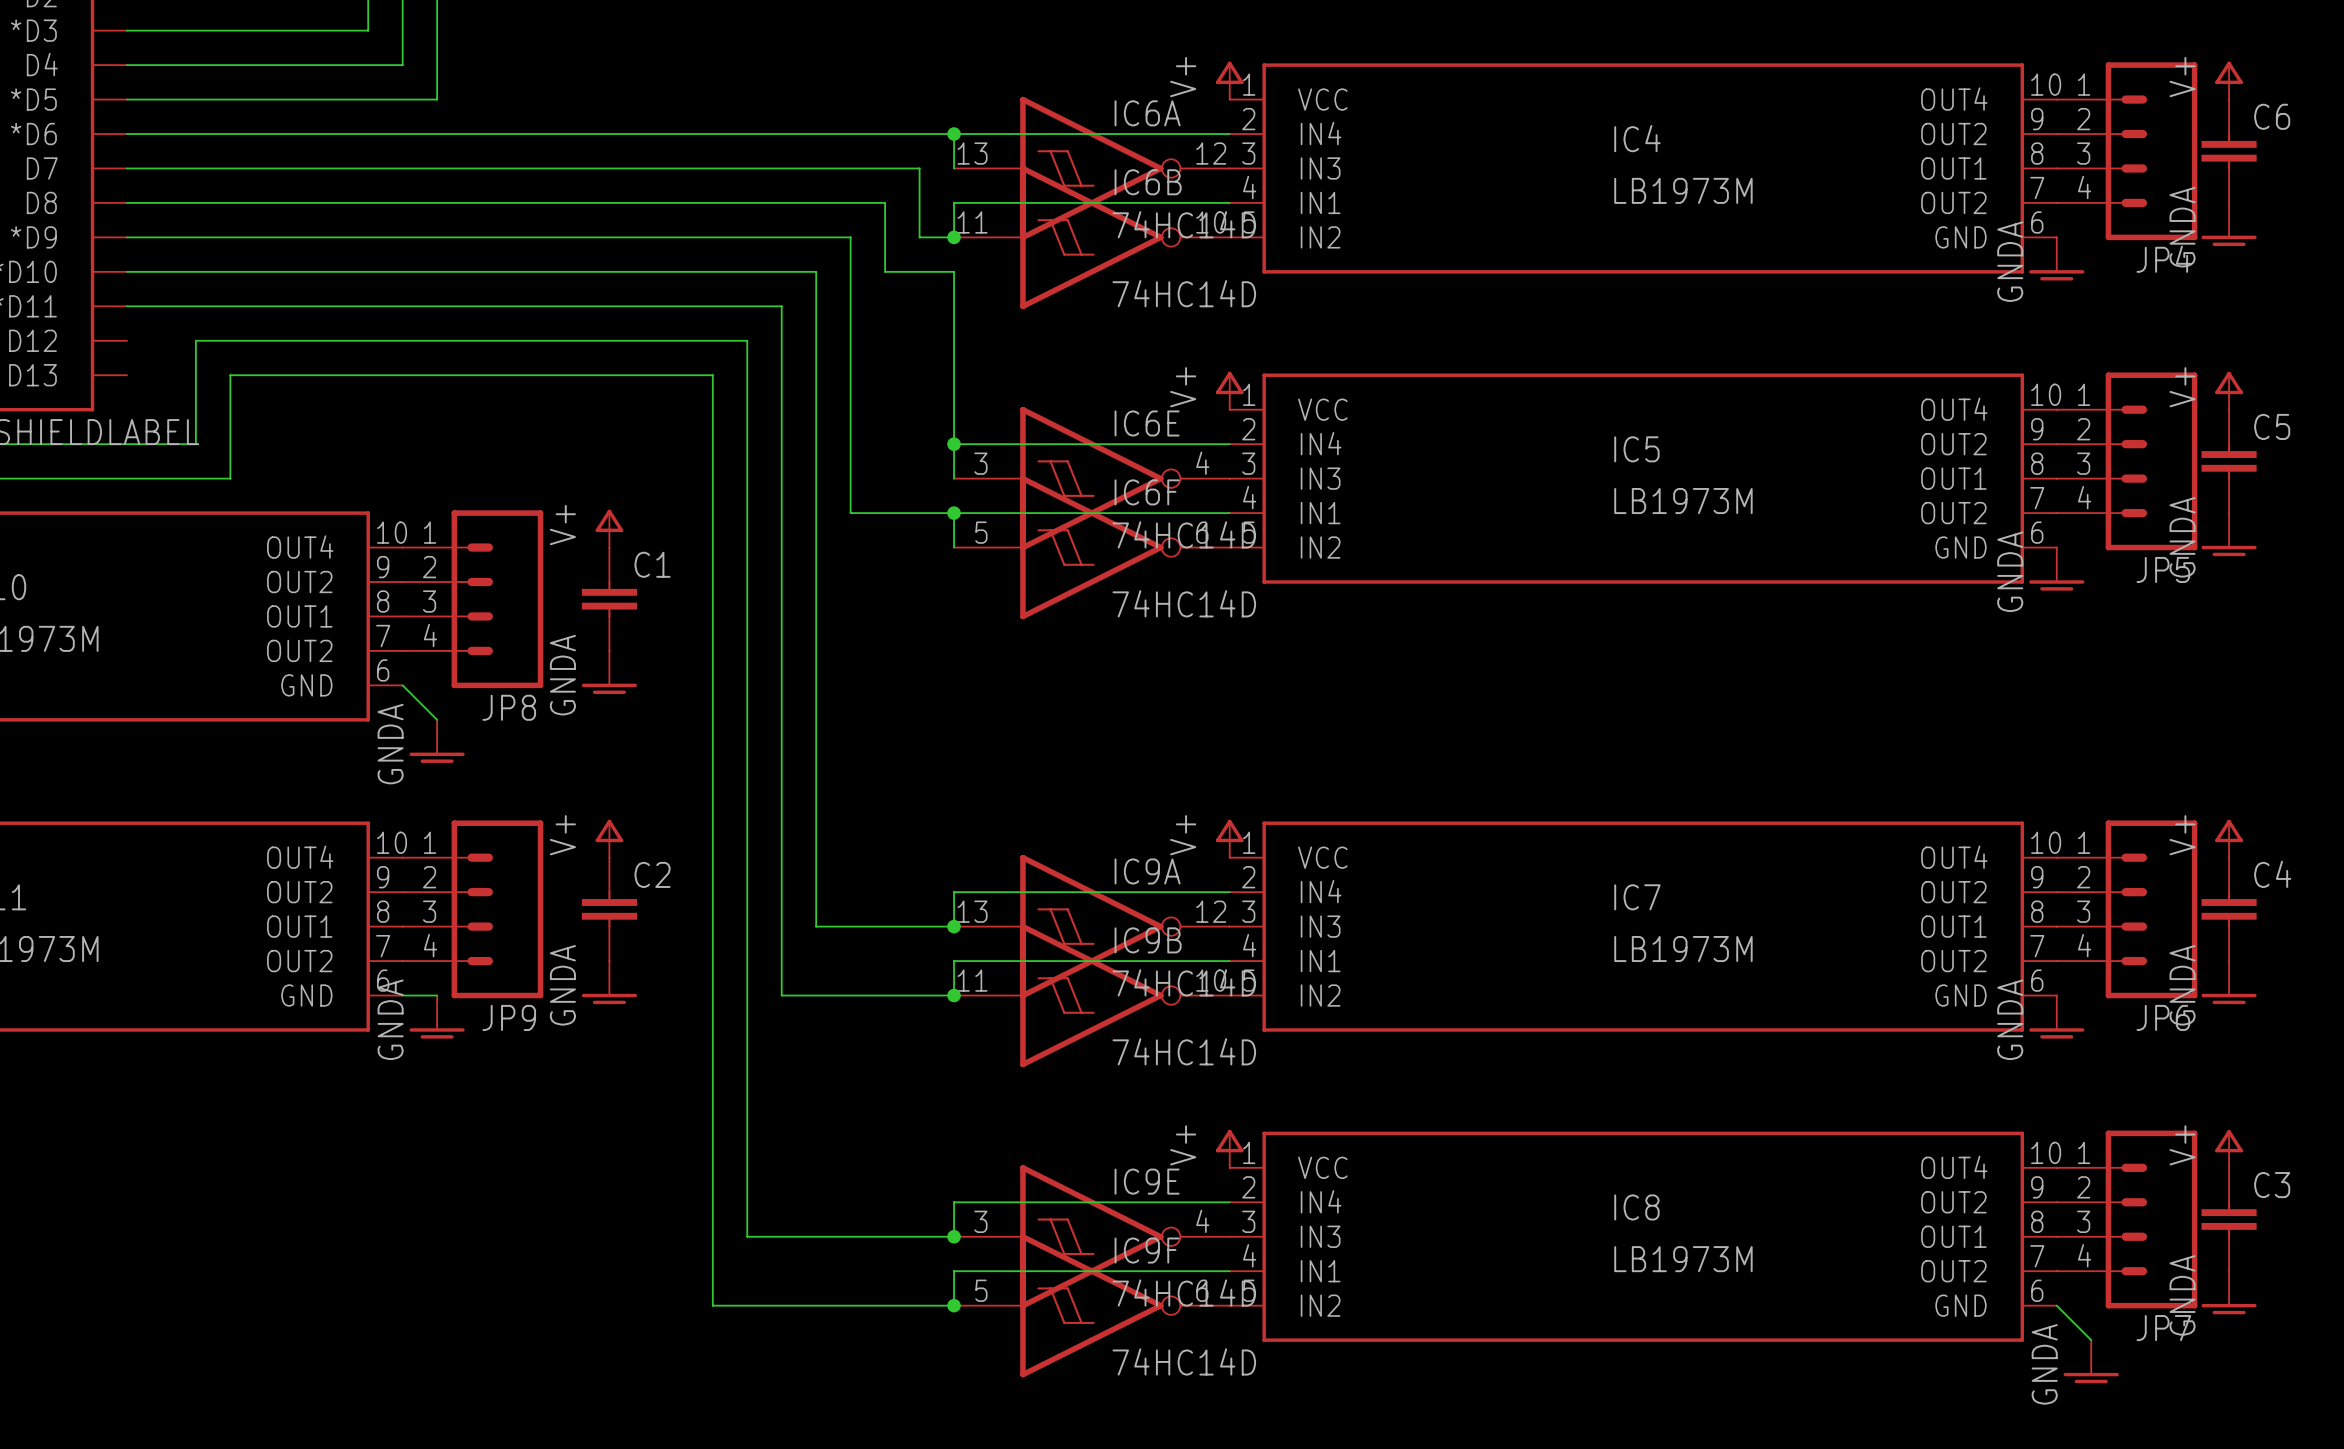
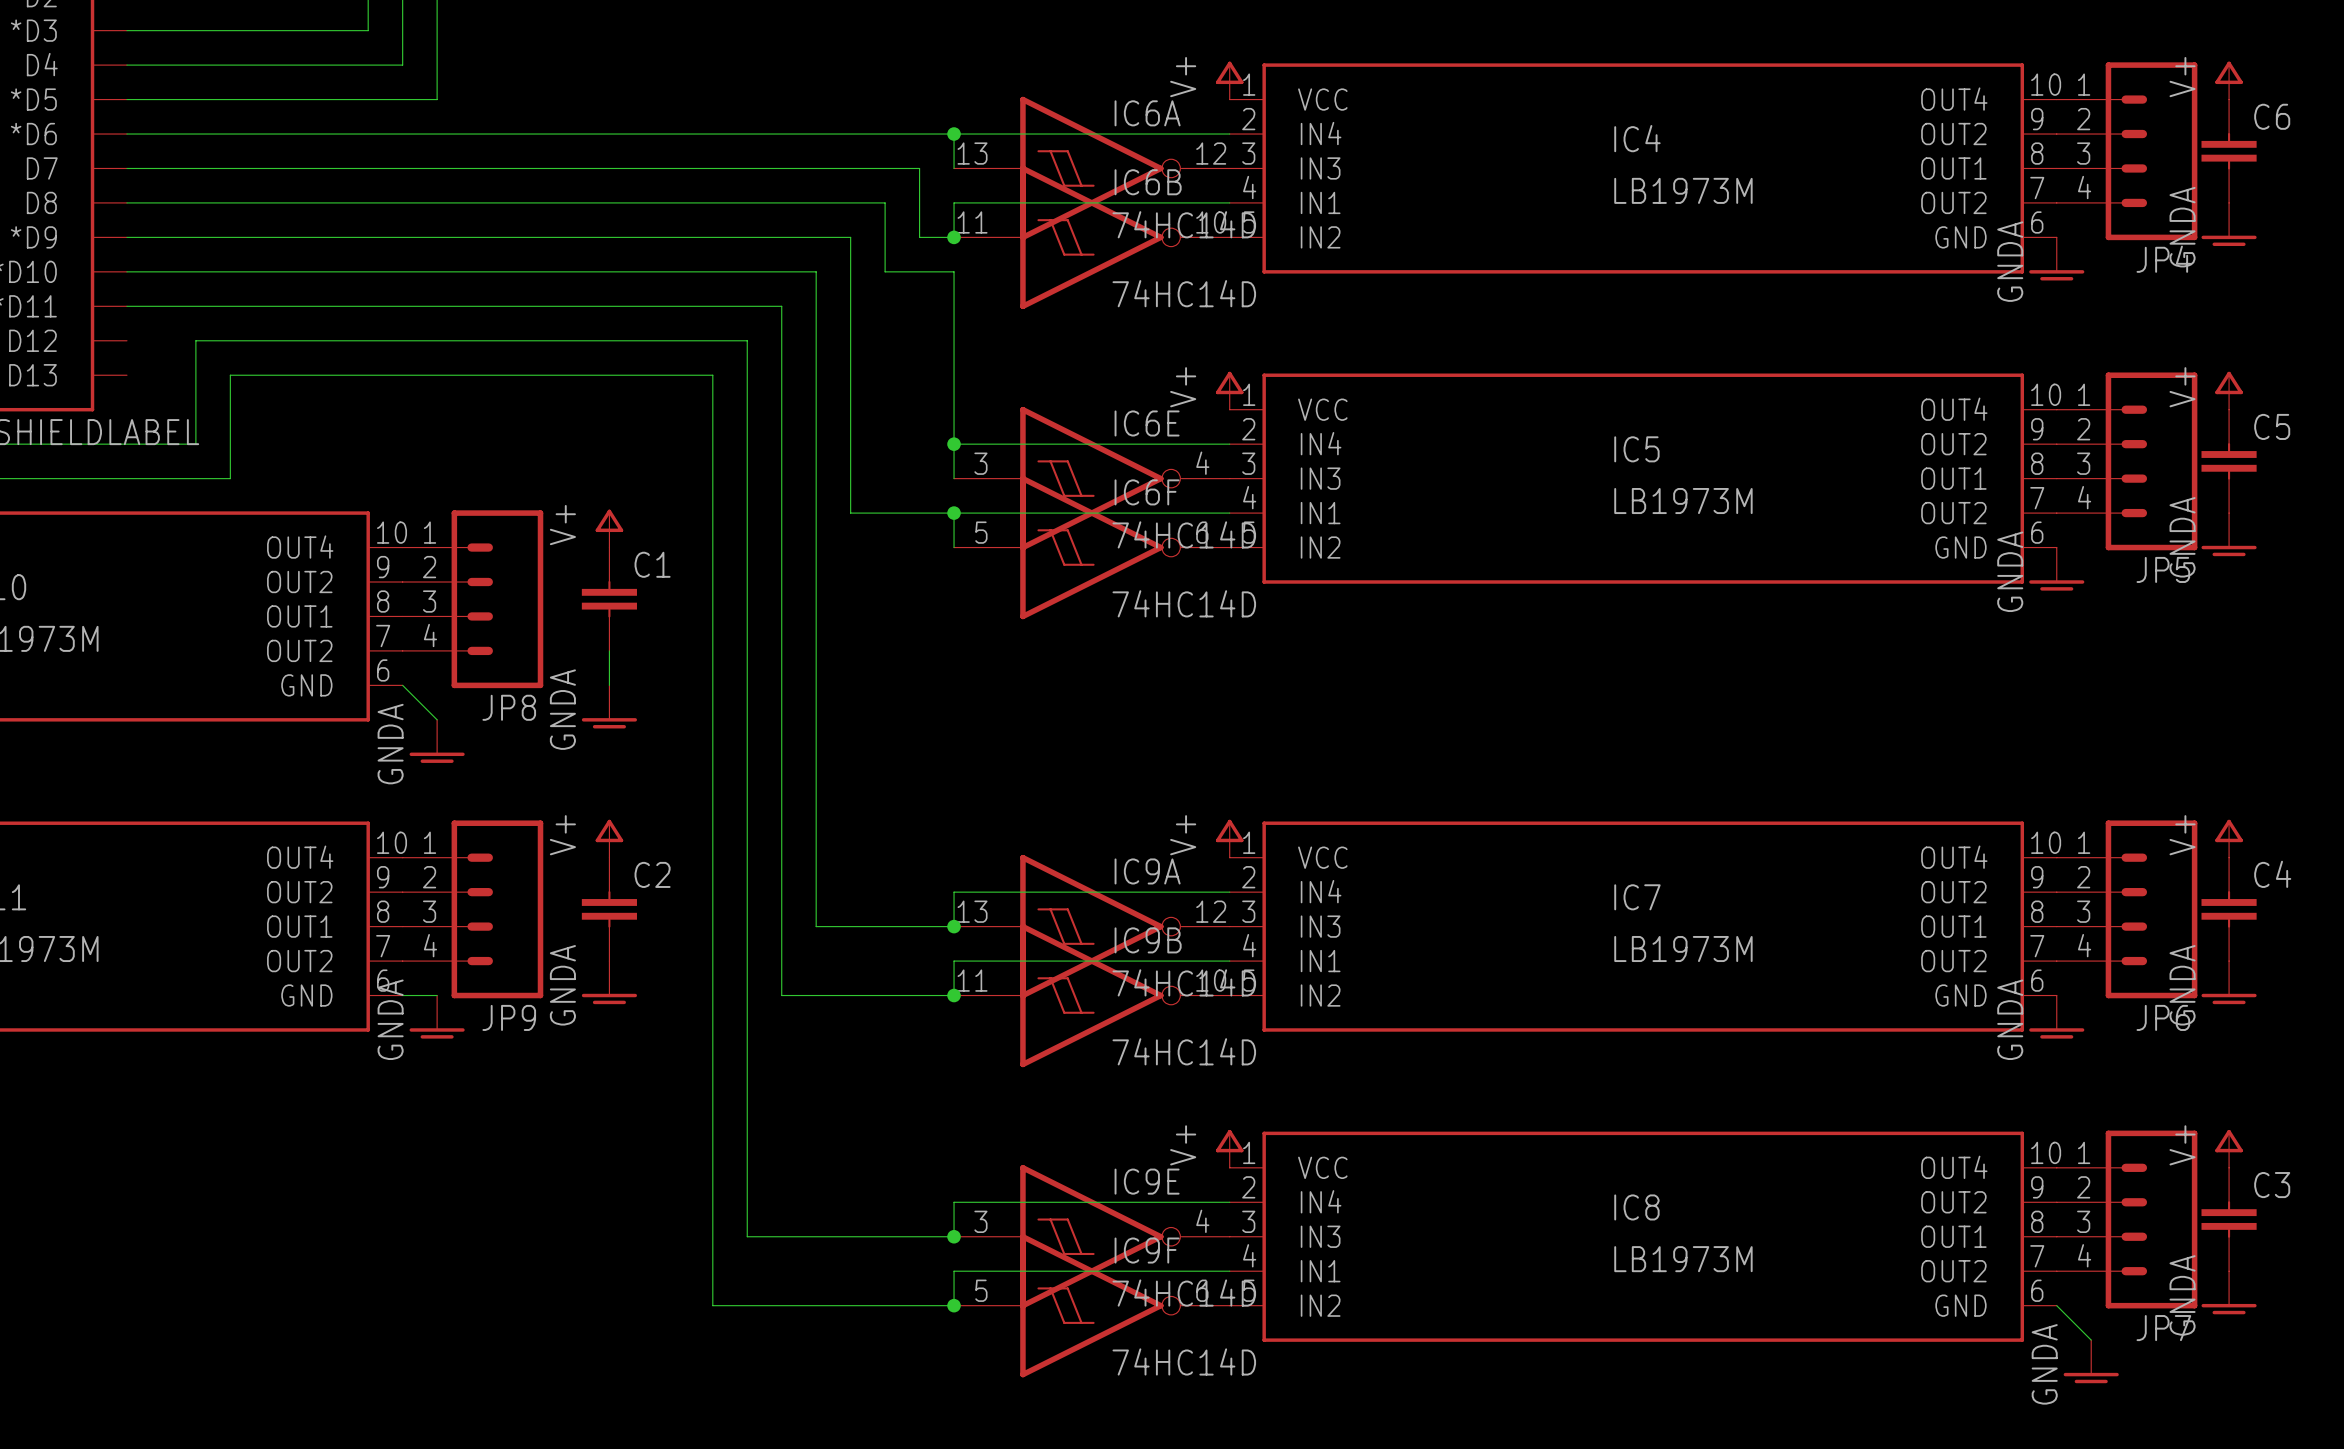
power symbol position: GNDA (609, 672) -> GNDA (609, 706)

